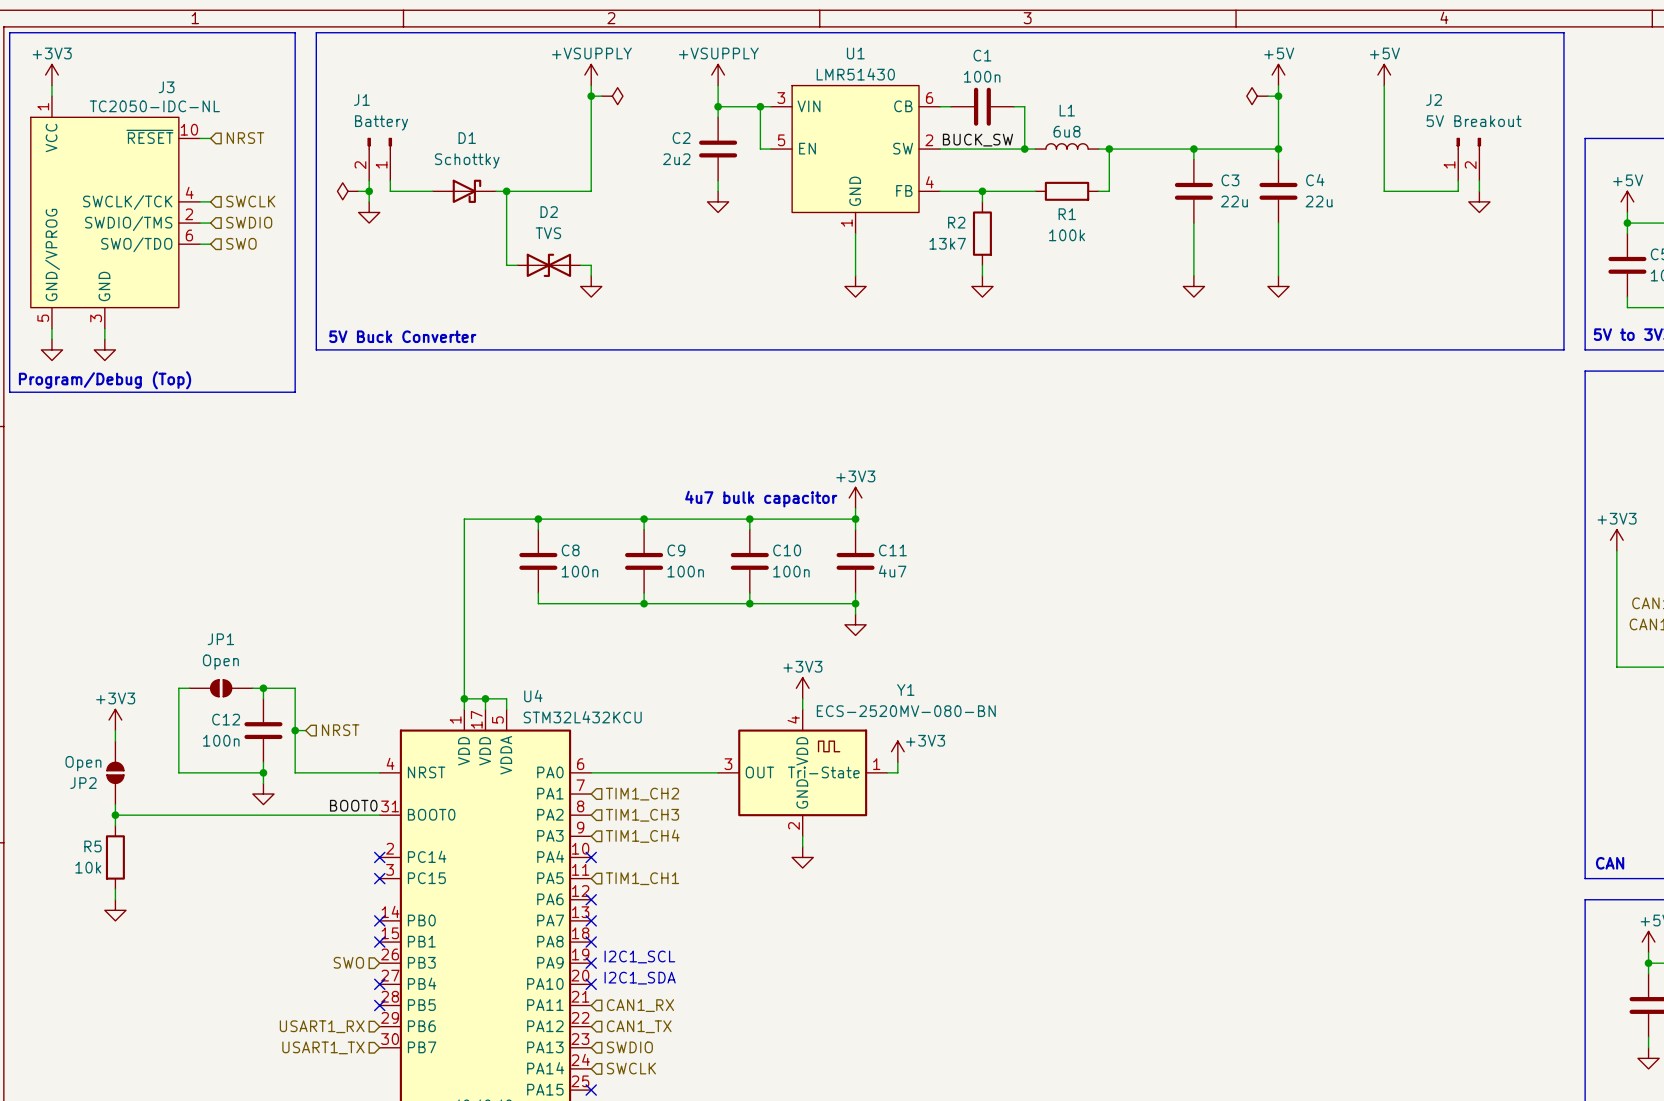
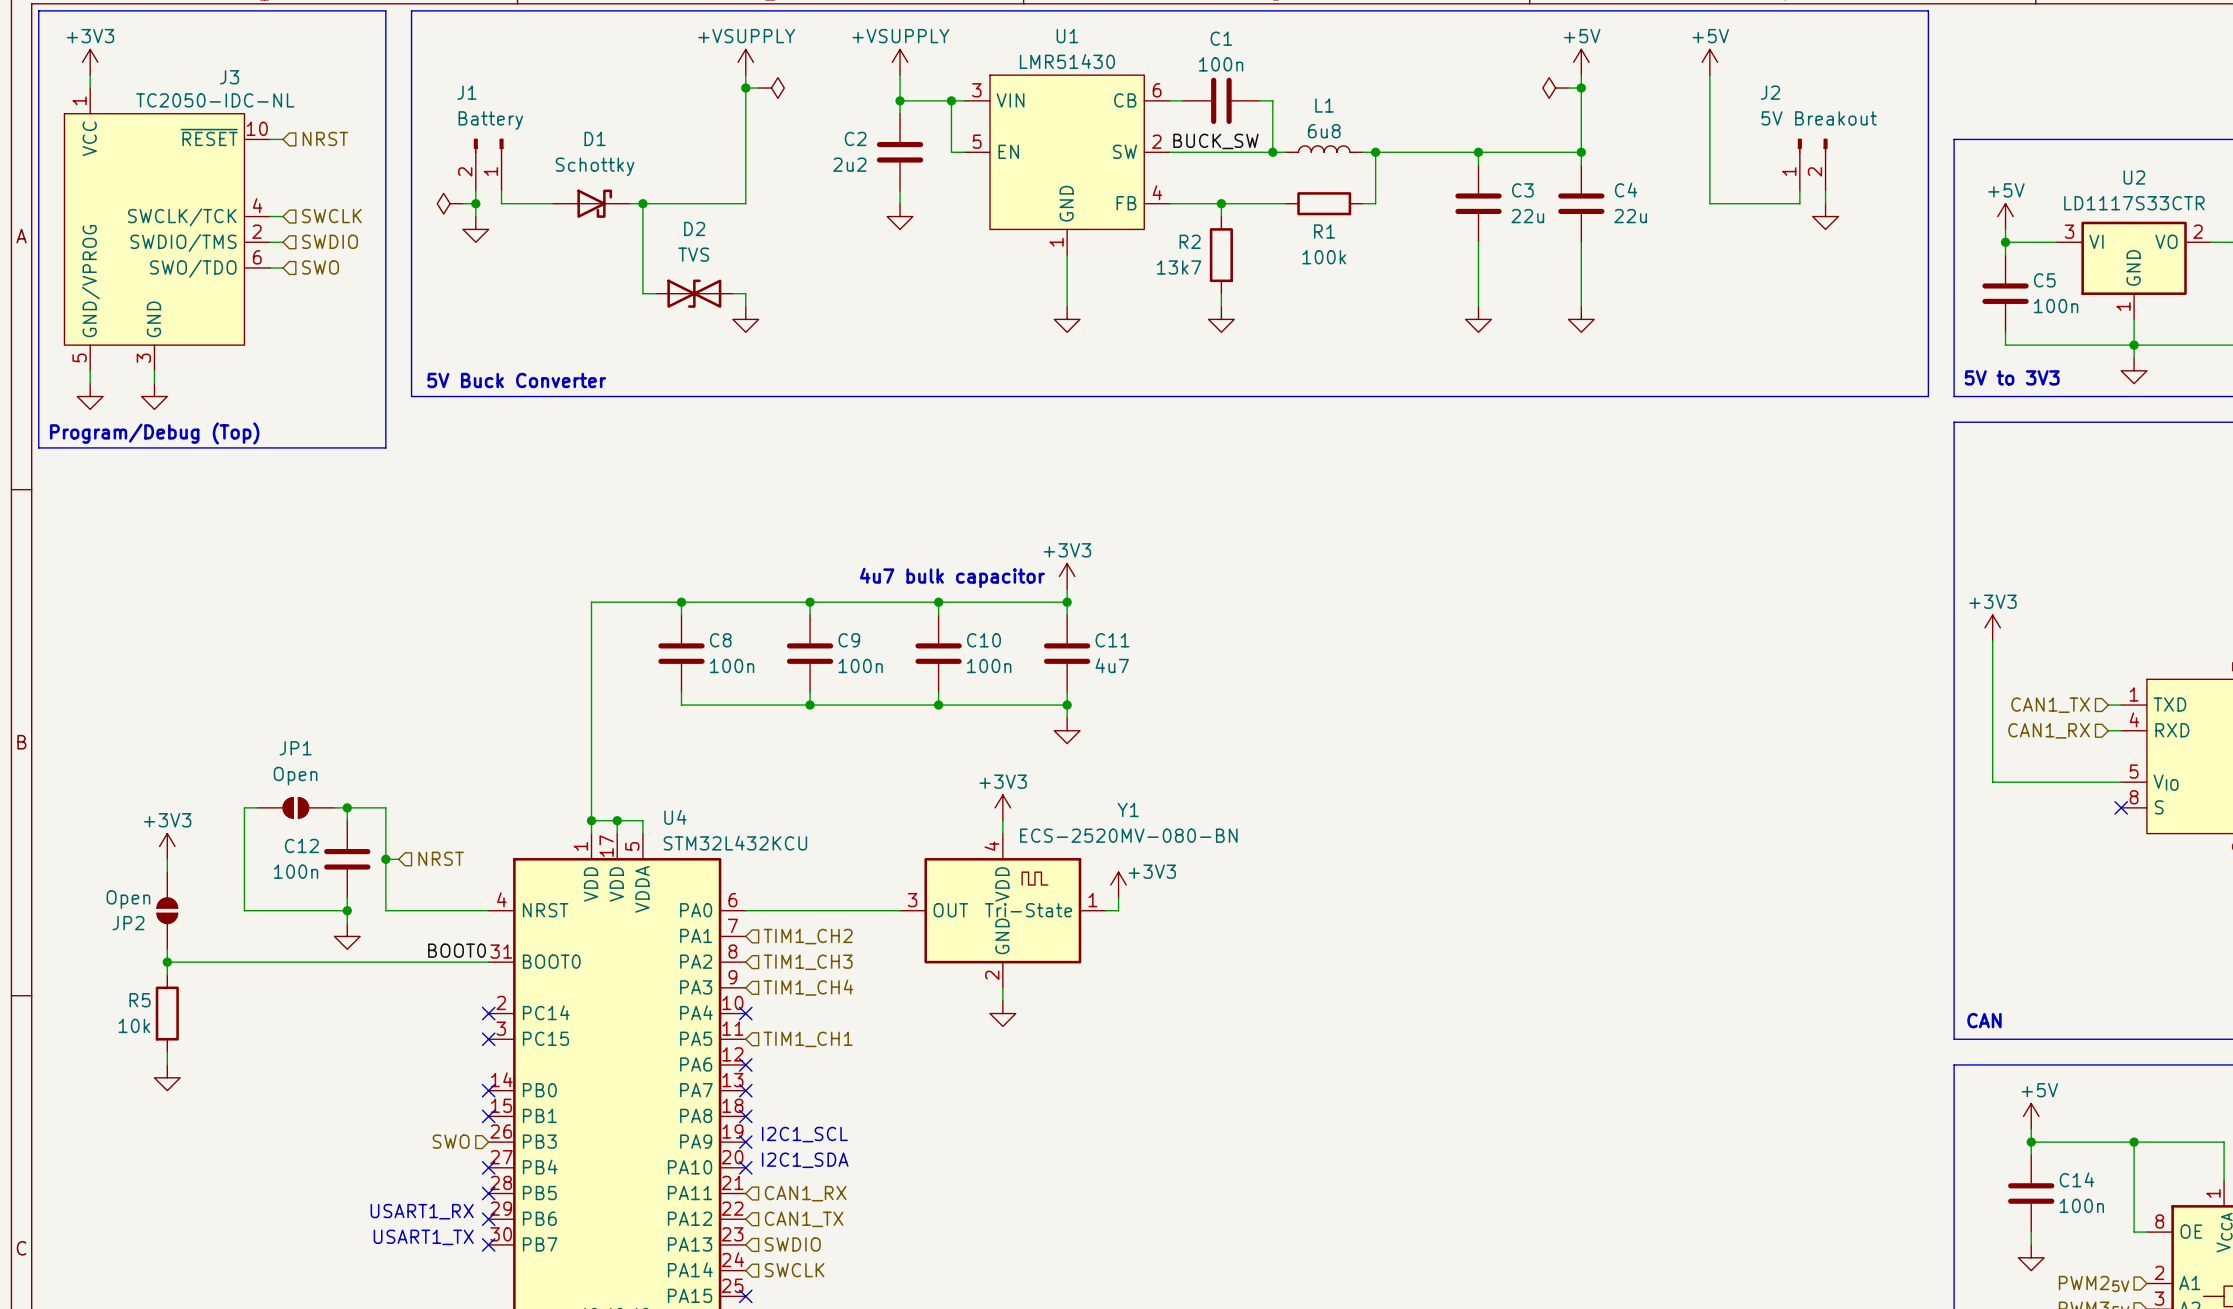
text: none -> USART1_RX (422, 1211)
hierarchical label: USART1_RX (322, 1026) -> none
no-connect mark: none -> (488, 1219)
text: none -> USART1_TX (423, 1237)
hierarchical label: USART1_TX (323, 1047) -> none
no-connect mark: none -> (488, 1244)

